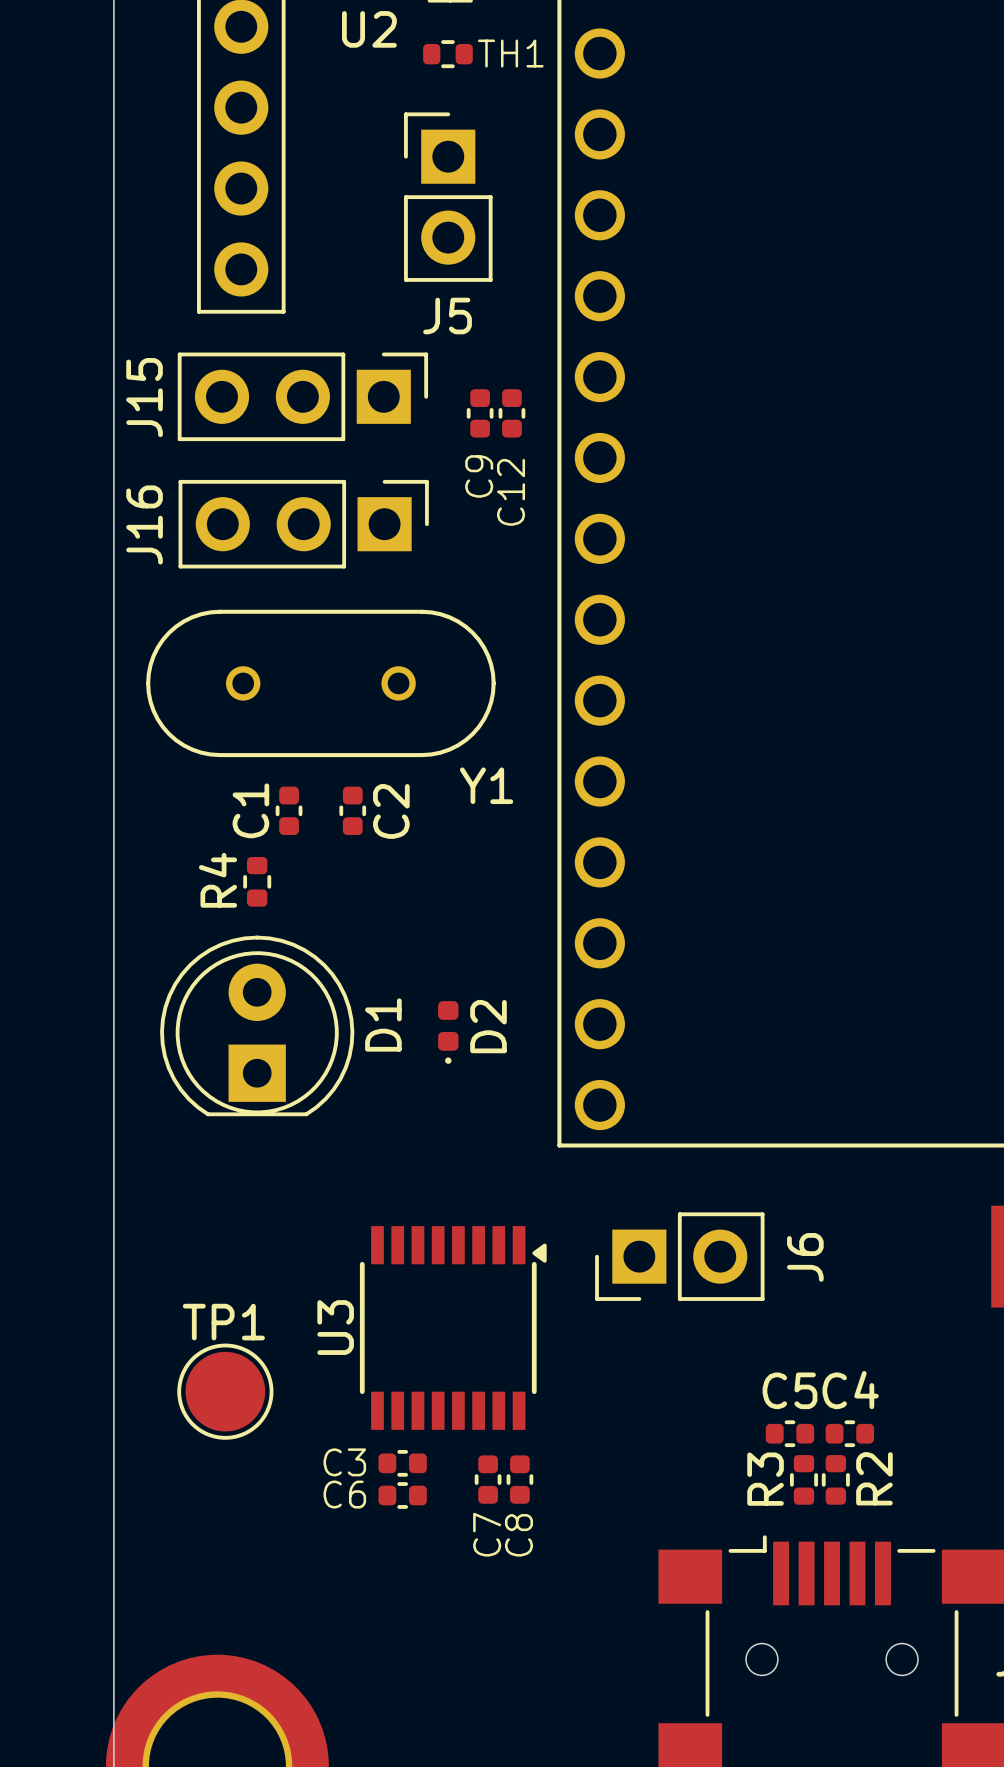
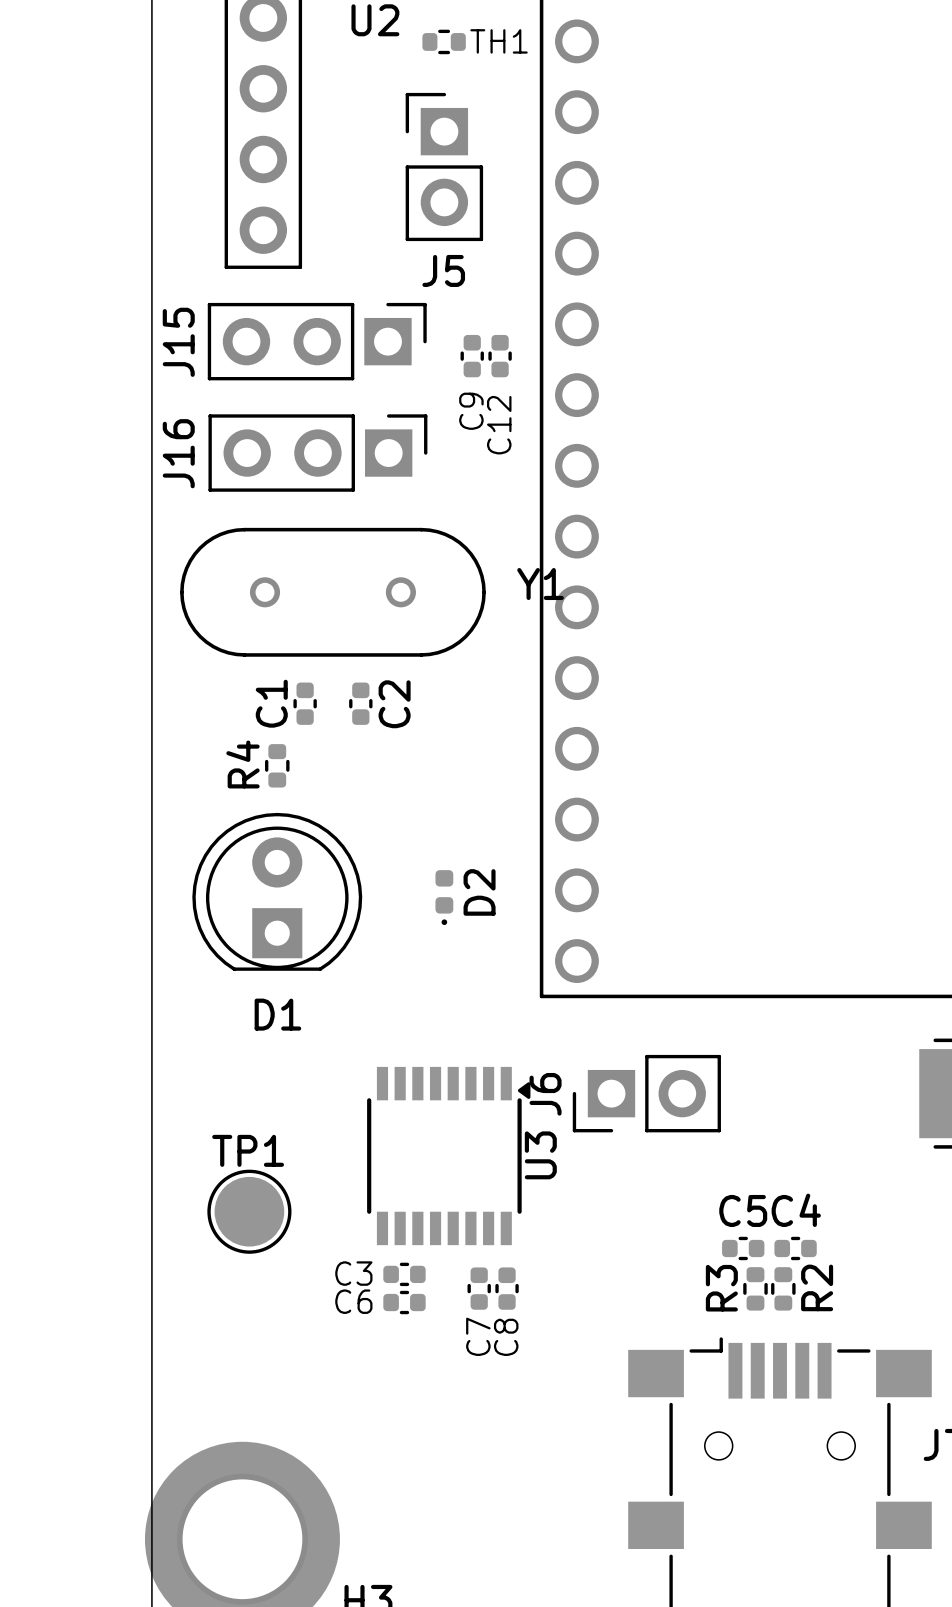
Y1 name position: Y1 (486, 785) -> Y1 (540, 584)
D1 name rotation: 0° (383, 1025) -> 90° clockwise (277, 1014)
D1 name position: D1 (383, 1025) -> D1 (277, 1014)
J6 name position: J6 (805, 1257) -> J6 (545, 1094)
U3 name position: U3 (335, 1327) -> U3 (540, 1155)

